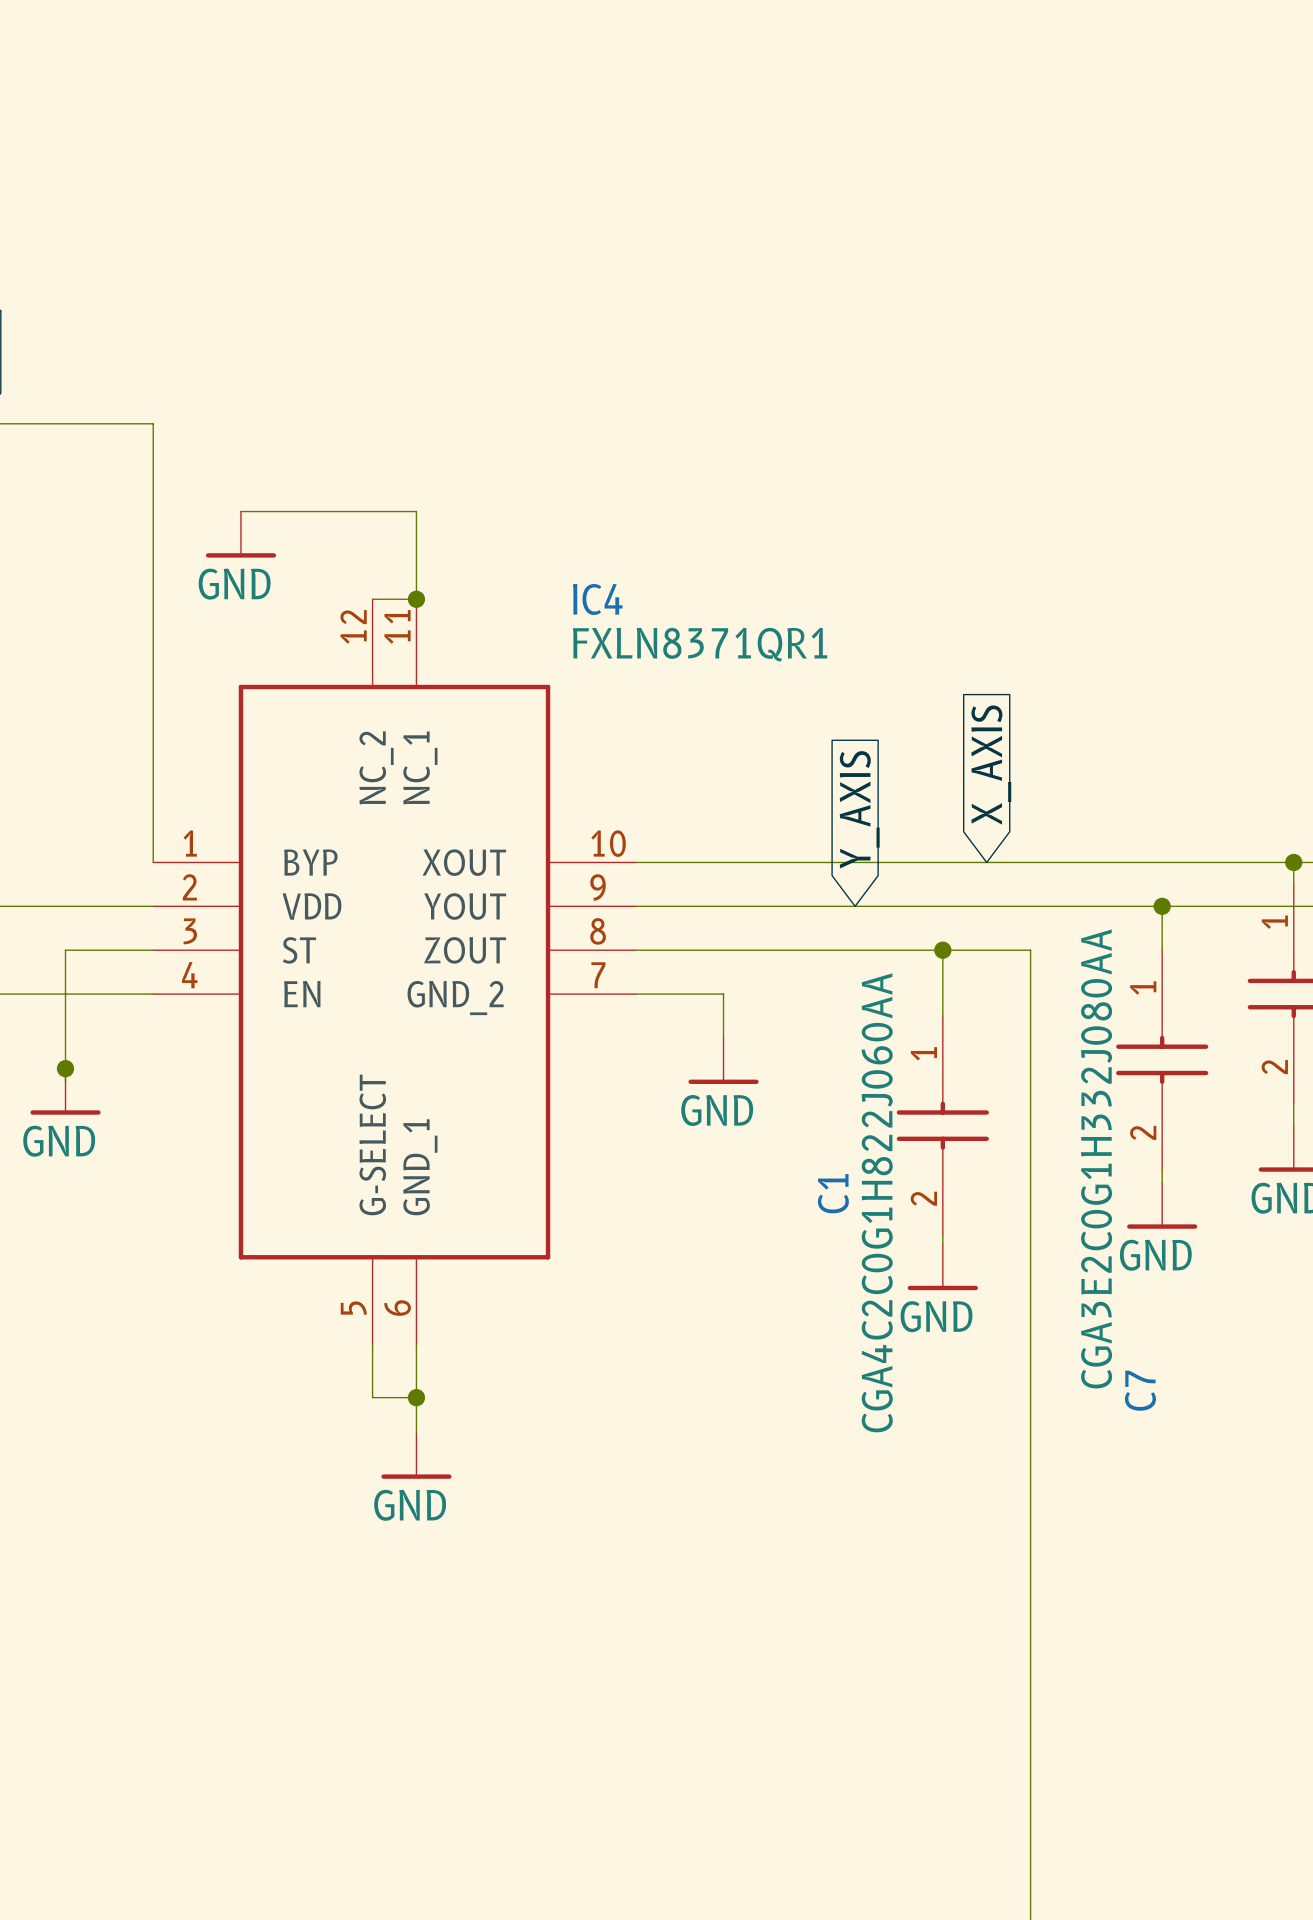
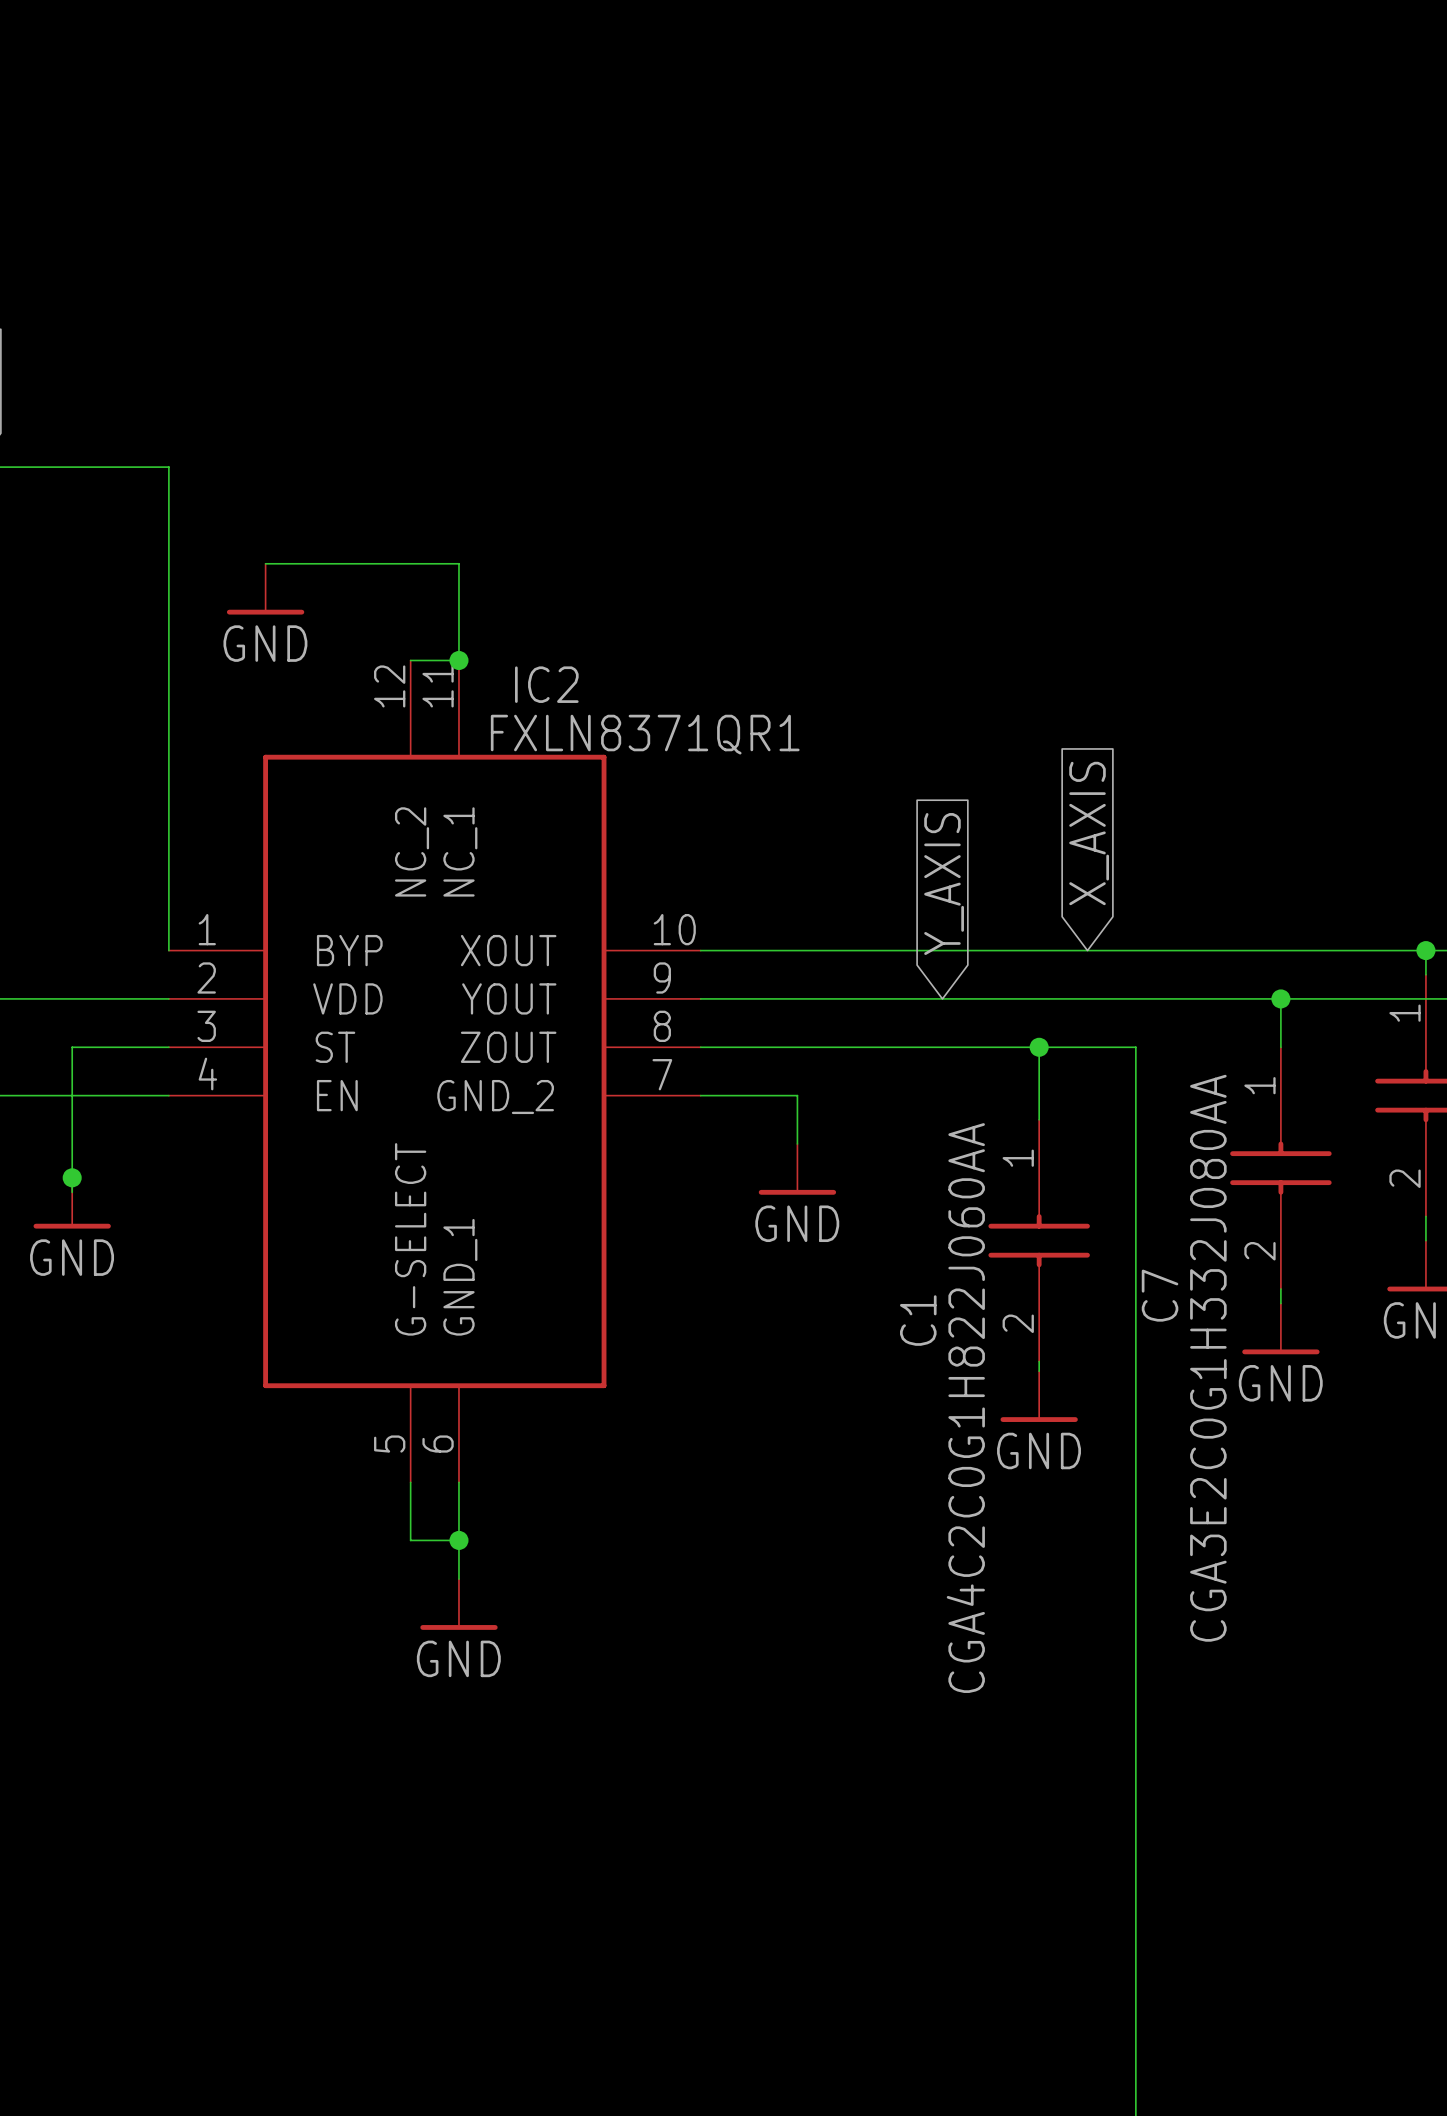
IC4 name: IC4 (597, 599) -> IC2 (546, 684)
IC4 value position: FXLN8371QR1 (700, 644) -> FXLN8371QR1 (645, 734)
C7 value position: CGA3E2C0G1H332J080AA (1096, 1158) -> CGA3E2C0G1H332J080AA (1208, 1358)
C1 value position: CGA4C2C0G1H822J060AA (877, 1202) -> CGA4C2C0G1H822J060AA (965, 1408)
C7 name position: C7 (1140, 1390) -> C7 (1160, 1295)

